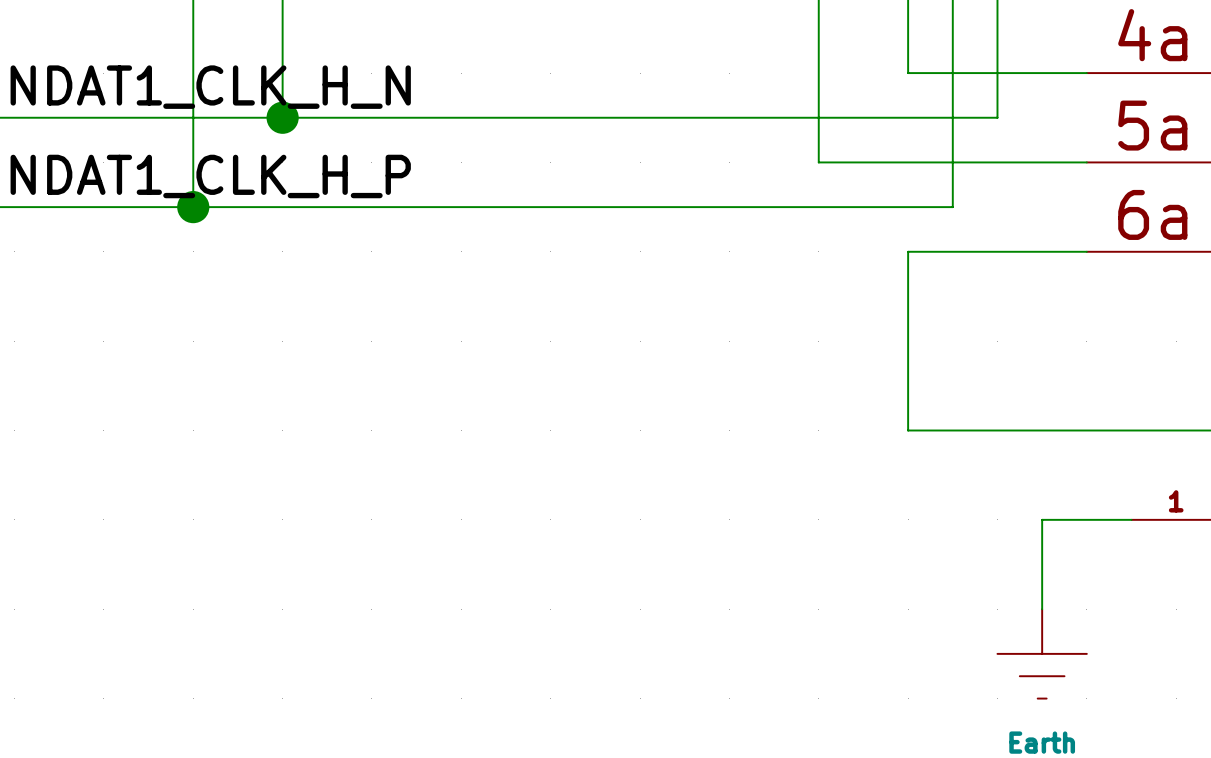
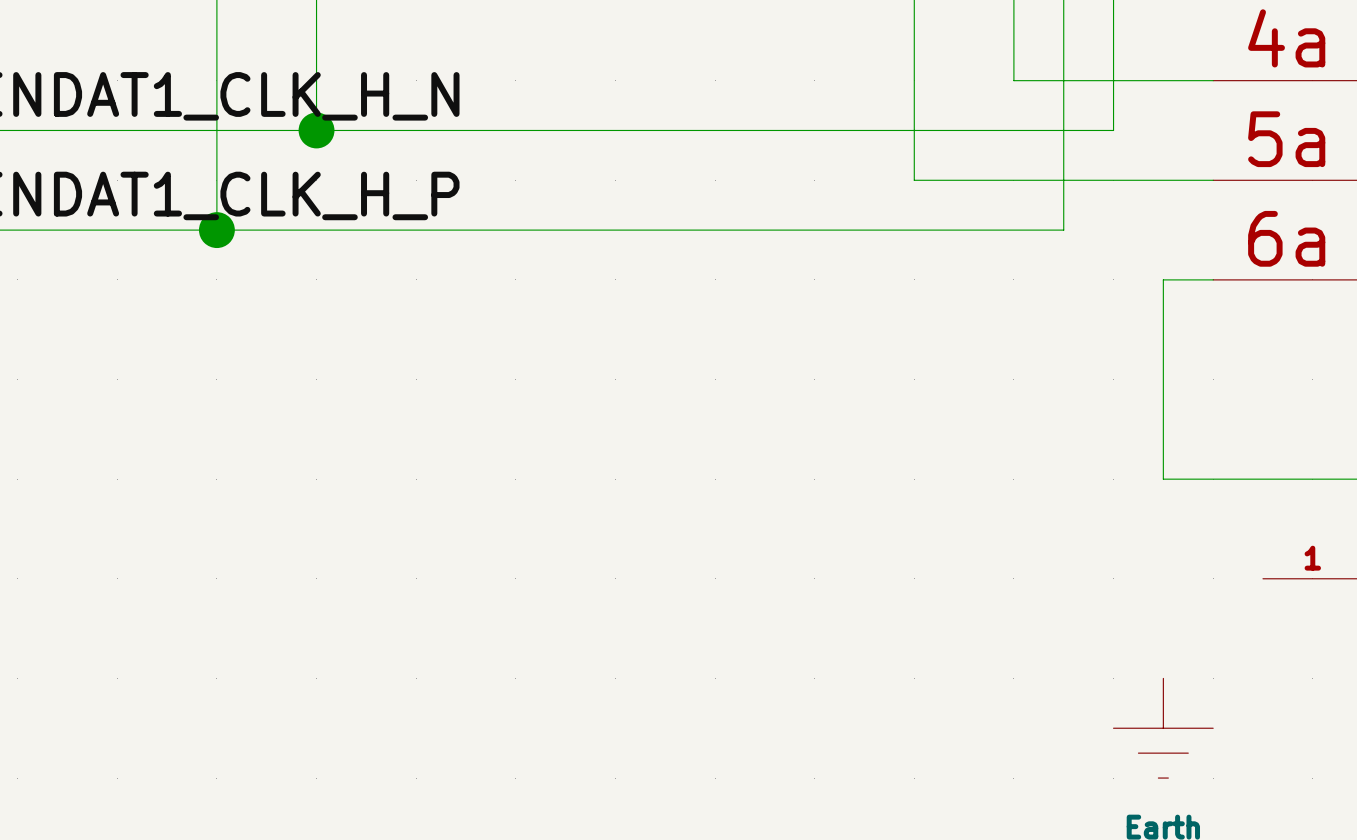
wire: (1042, 251) (908, 251) (908, 430) (1042, 430) -> (1163, 279) (1163, 479)
wire: (1131, 519) (1042, 519) (1042, 609) -> none

